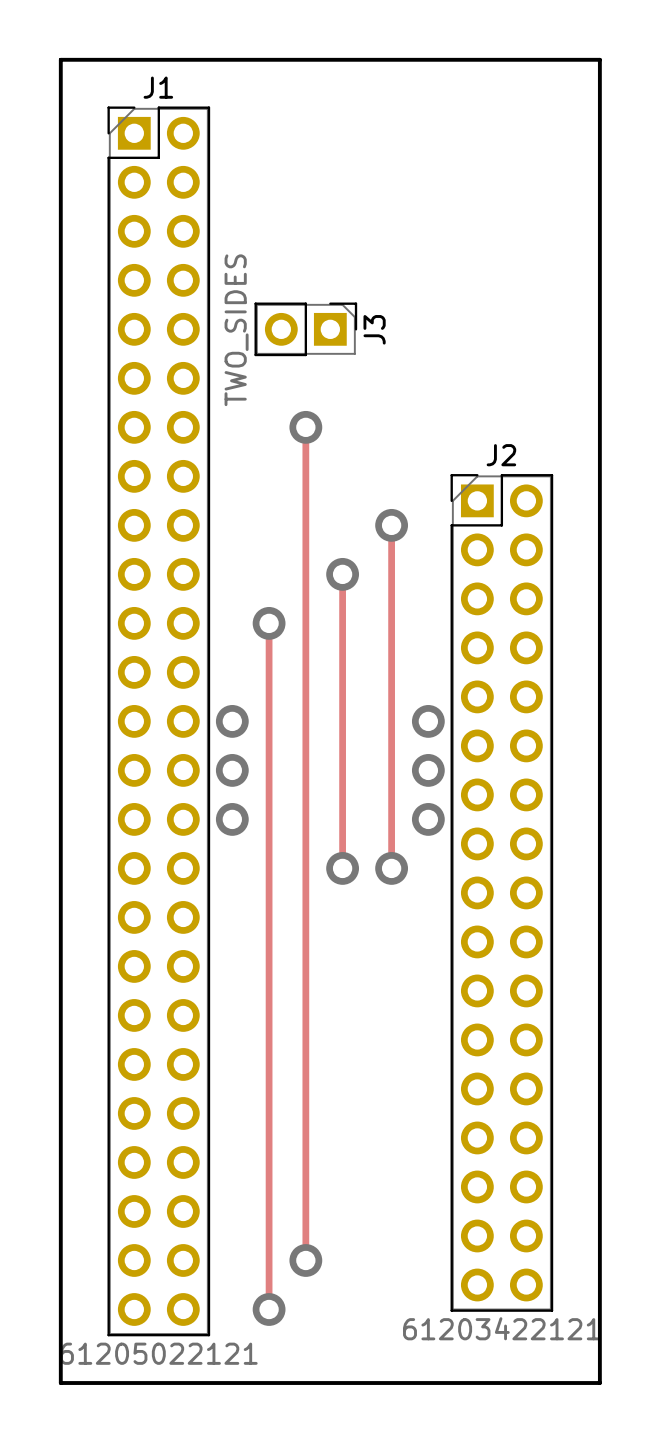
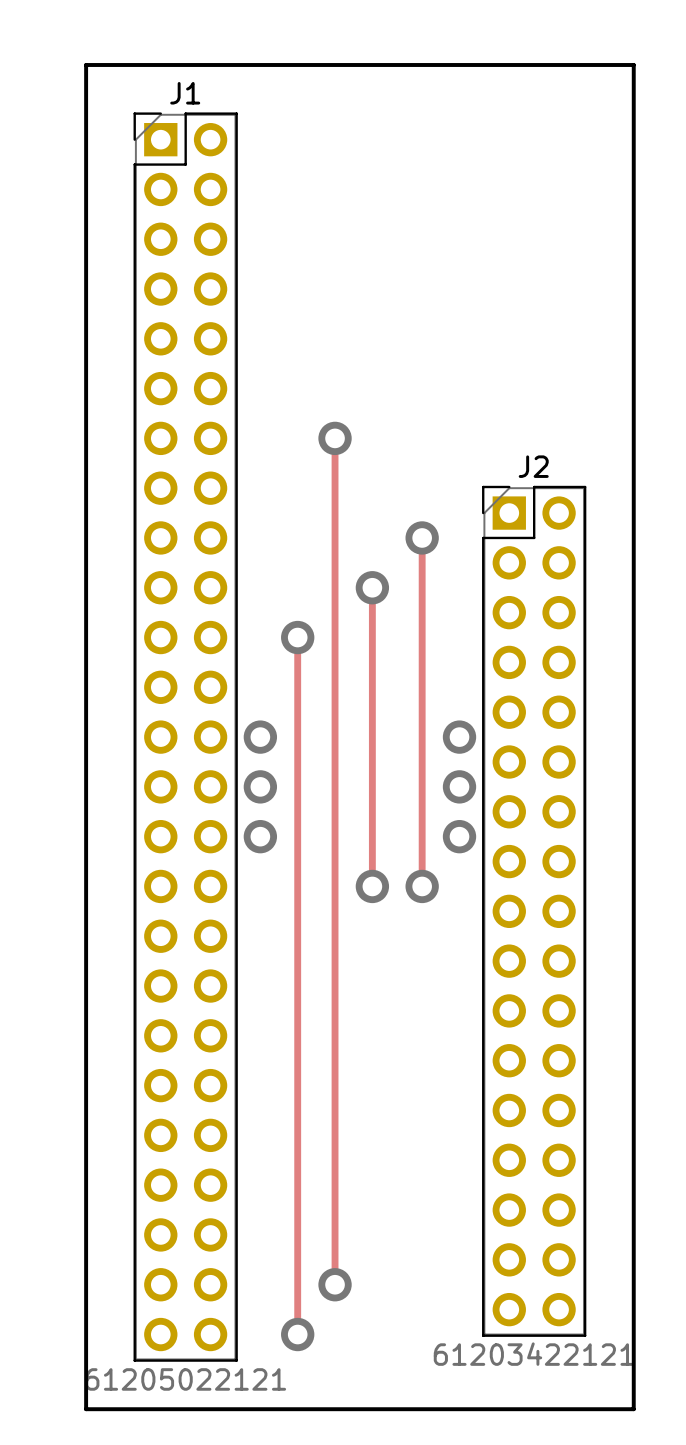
J3: TWO_SIDES (305, 329) -> none

